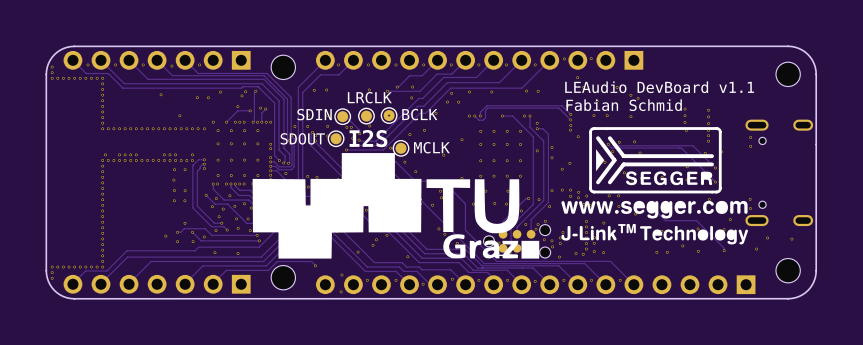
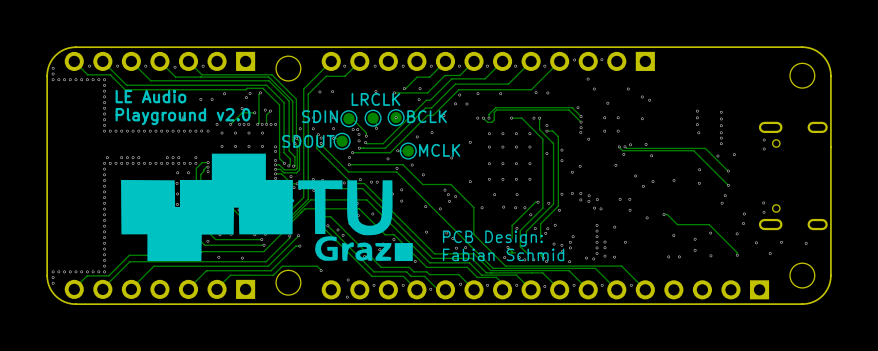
text: LEAudio DevBoard v1.1 (659, 87) -> none
text: none -> LE Audio (150, 96)
text position: Fabian Schmid (624, 105) -> Fabian Schmid (503, 254)
text: none -> Playground v2.0 (183, 116)
line: (716, 128) (592, 128) (590, 132) (590, 189) (594, 192) (718, 191) (720, 188) (720, 132) (716, 128) -> none
text: I2S (368, 138) -> none
line: (598, 138) (614, 160) (598, 182) -> none
line: (609, 138) (623, 156) (712, 156) -> none
drawing: [596, 149, 605, 172] -> none
line: (712, 164) (623, 164) (609, 182) -> none
drawing: [626, 171, 713, 186] -> none
drawing: [561, 200, 748, 245] -> none
part position: (395, 205) -> (266, 207)
text: none -> PCB Design: (492, 238)
part: (517, 241) -> none

